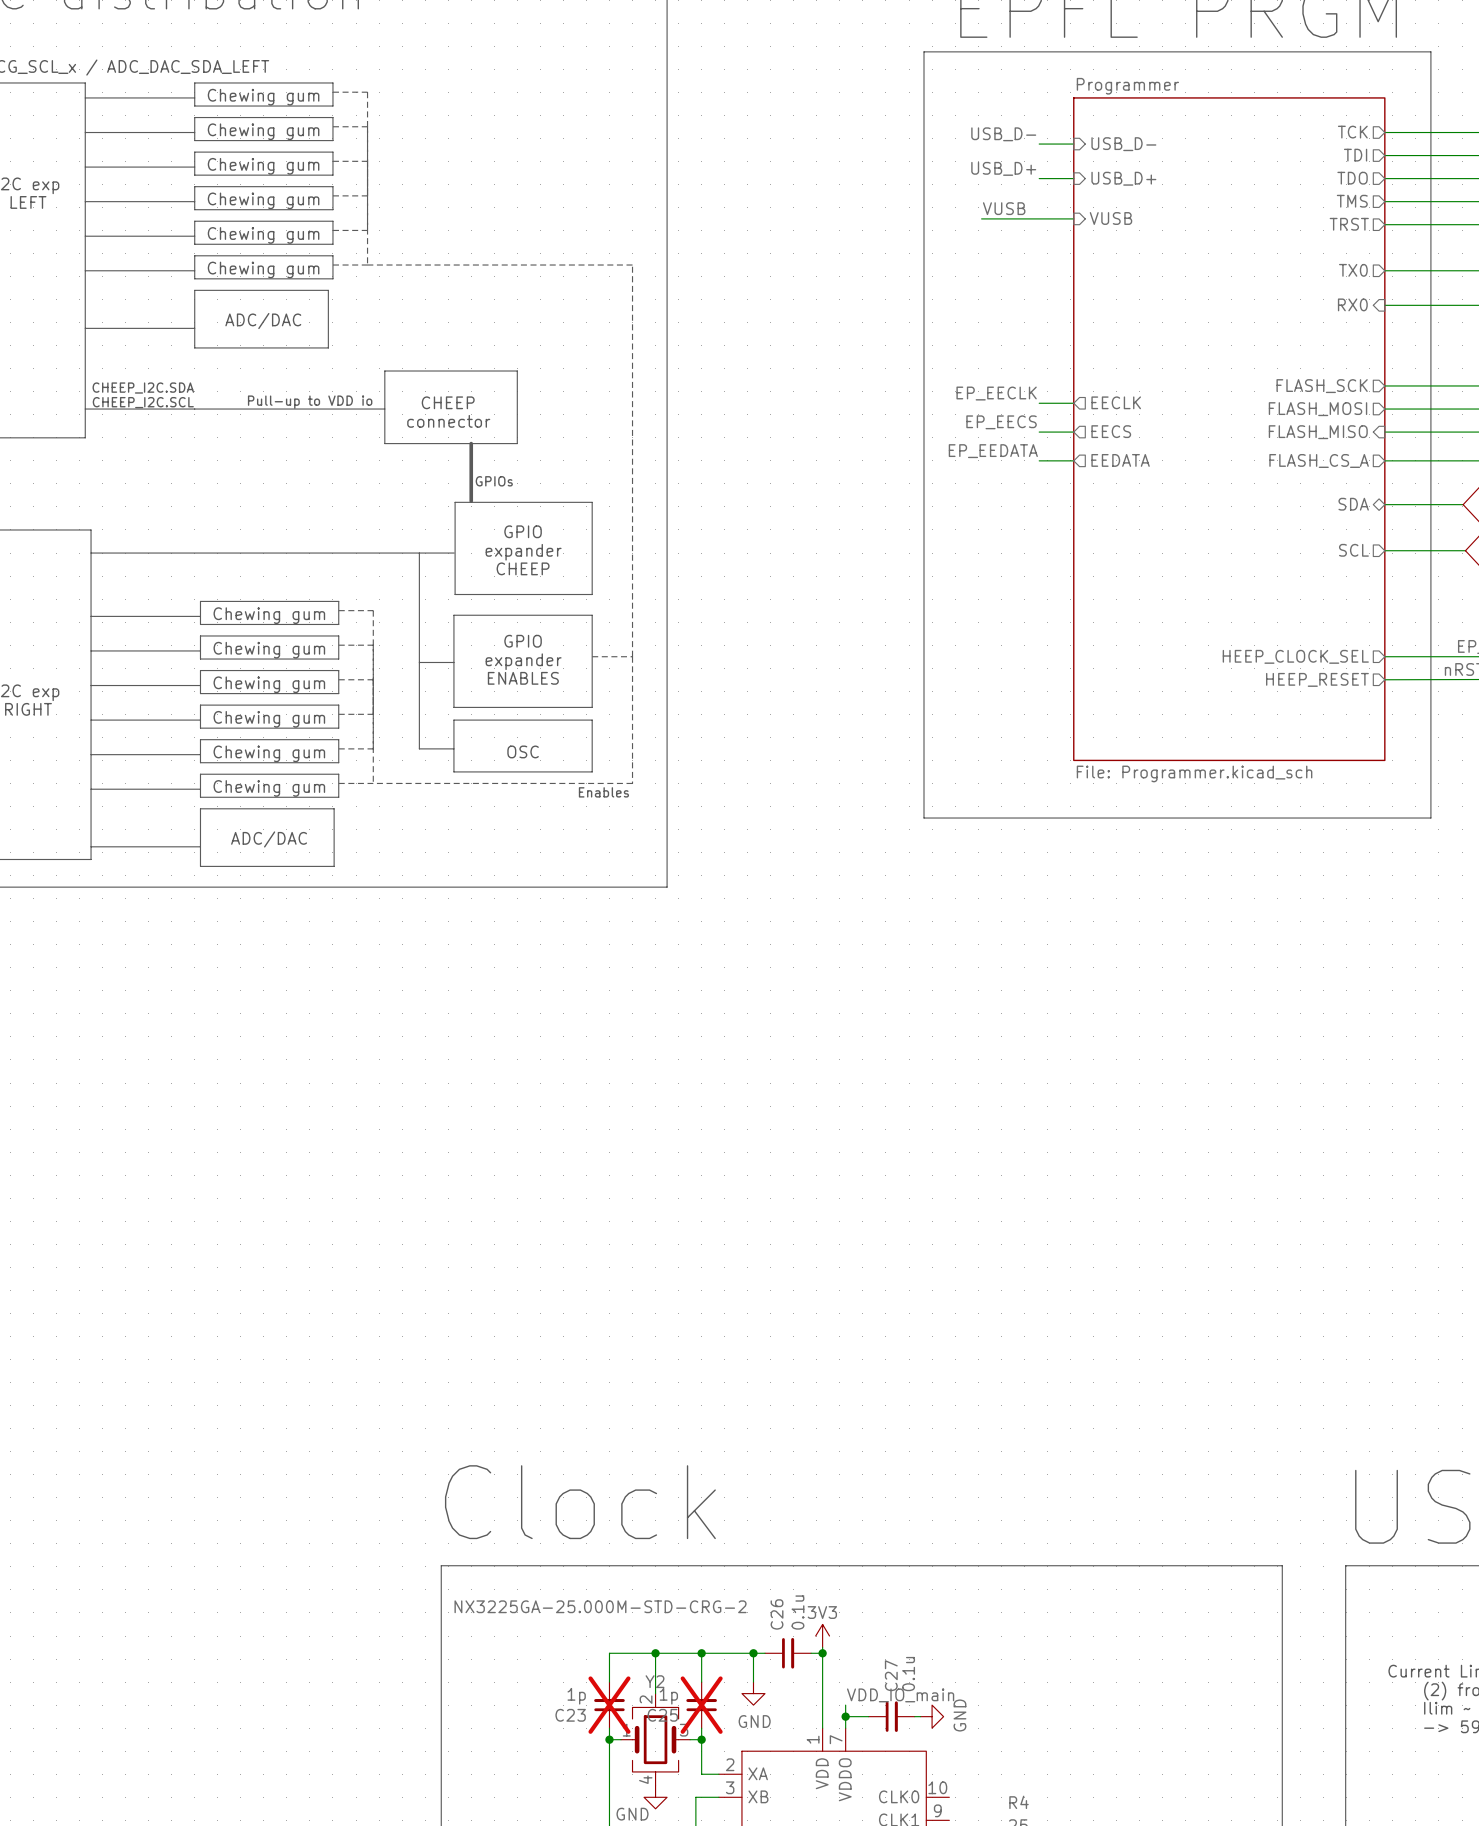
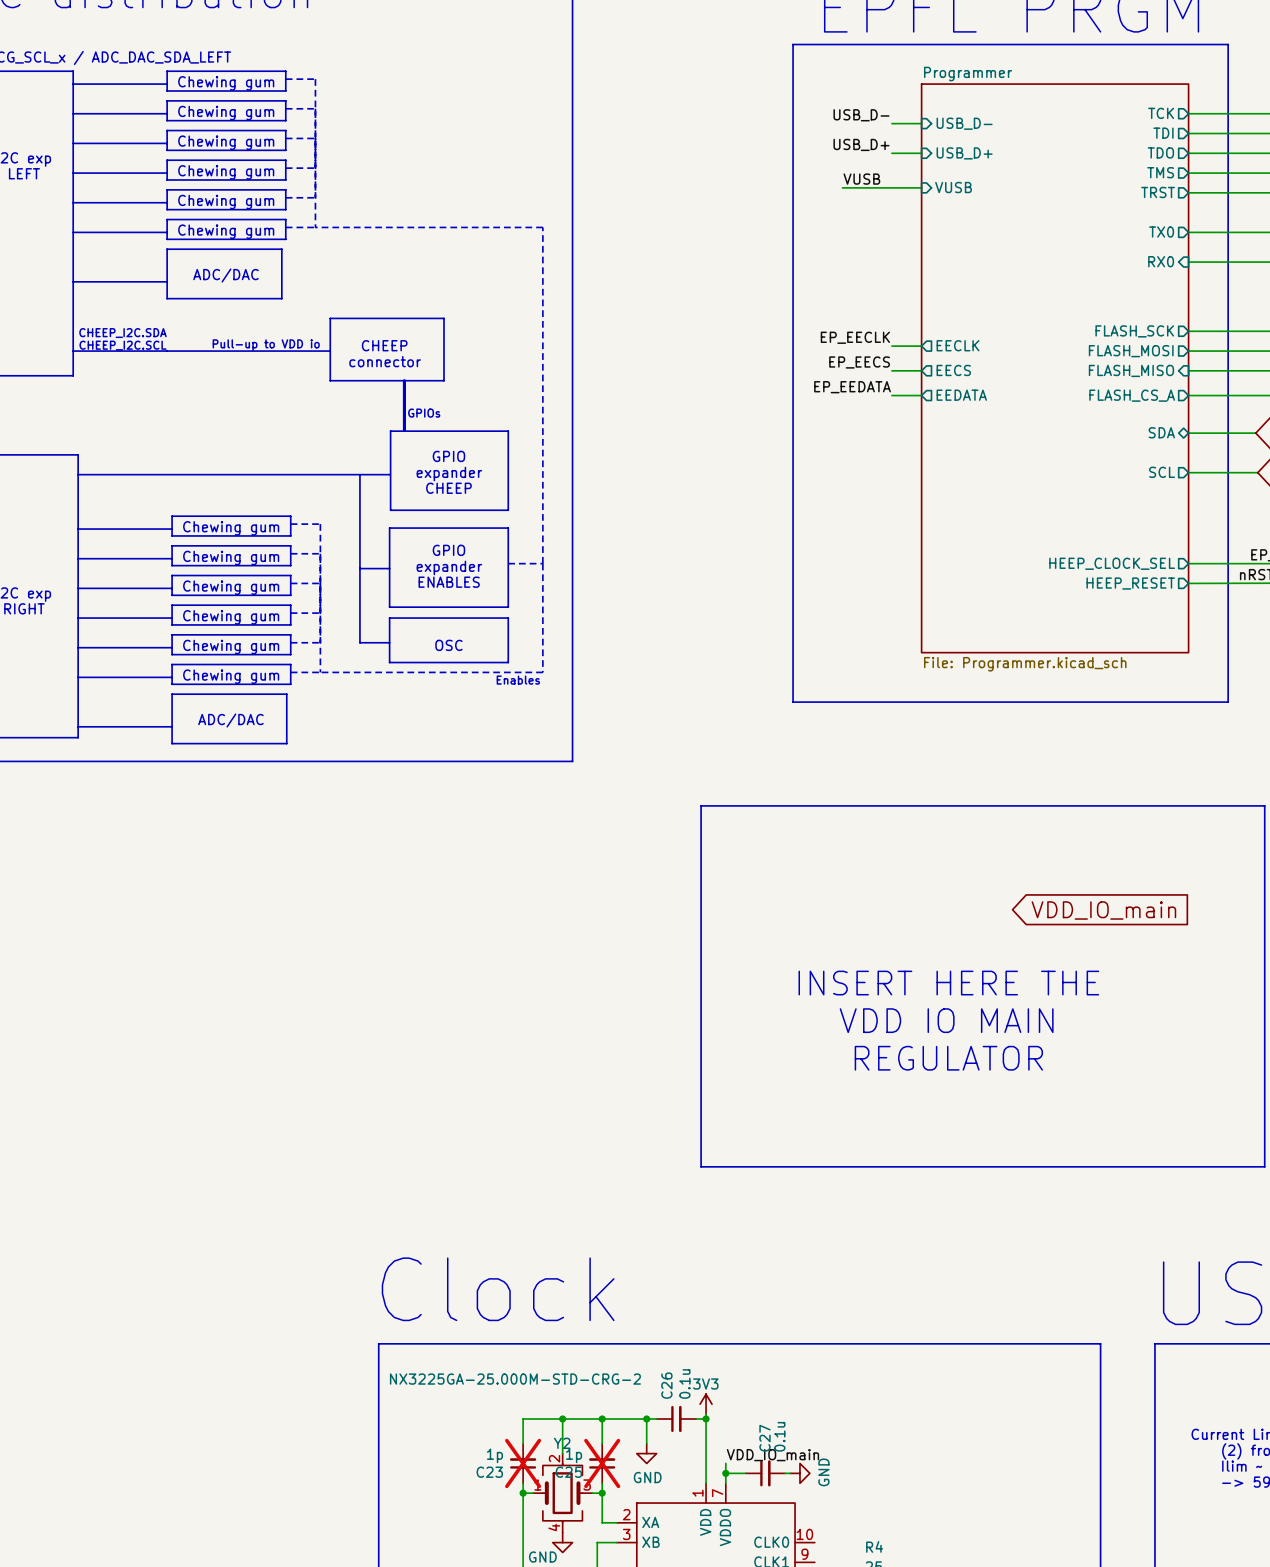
line: none -> (701, 805) (1264, 805) (1264, 1166) (701, 1166) (701, 805)
global label: none -> VDD_IO_main (1103, 910)
text: none -> INSERT HERE THE (948, 983)
text: none -> VDD IO MAIN (946, 1020)
text: none -> REGULATOR (948, 1058)

